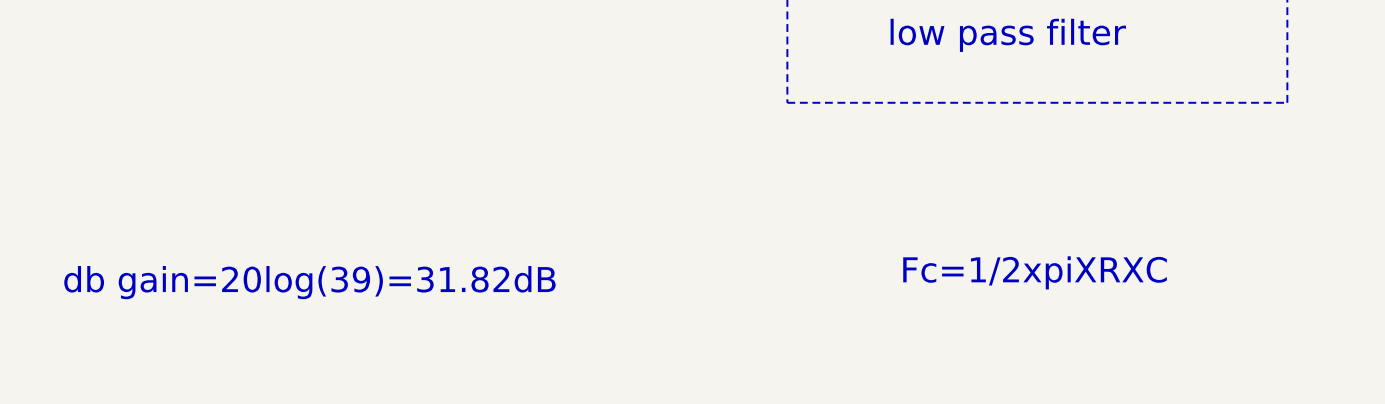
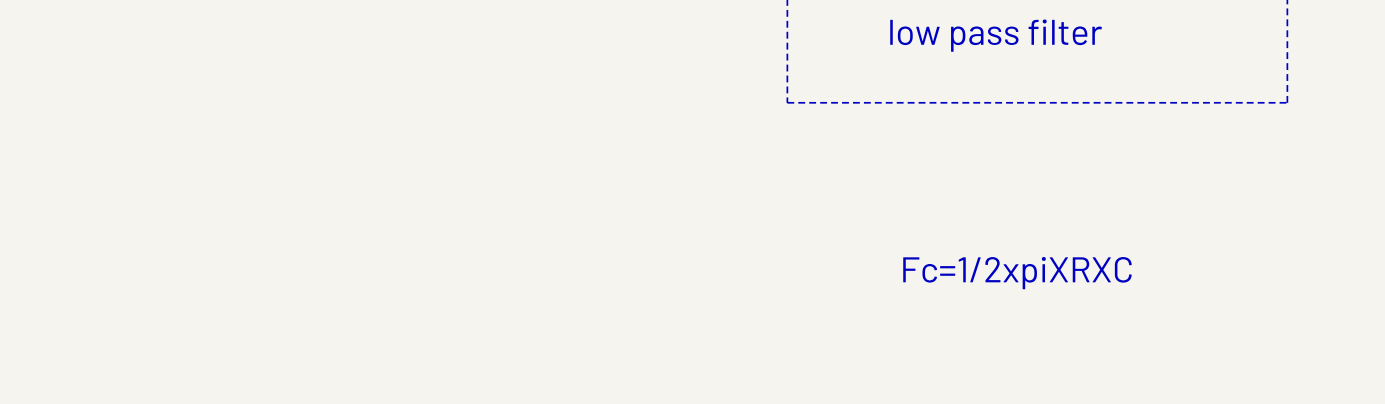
text: db gain=20log(39)=31.82dB (309, 282) -> none

